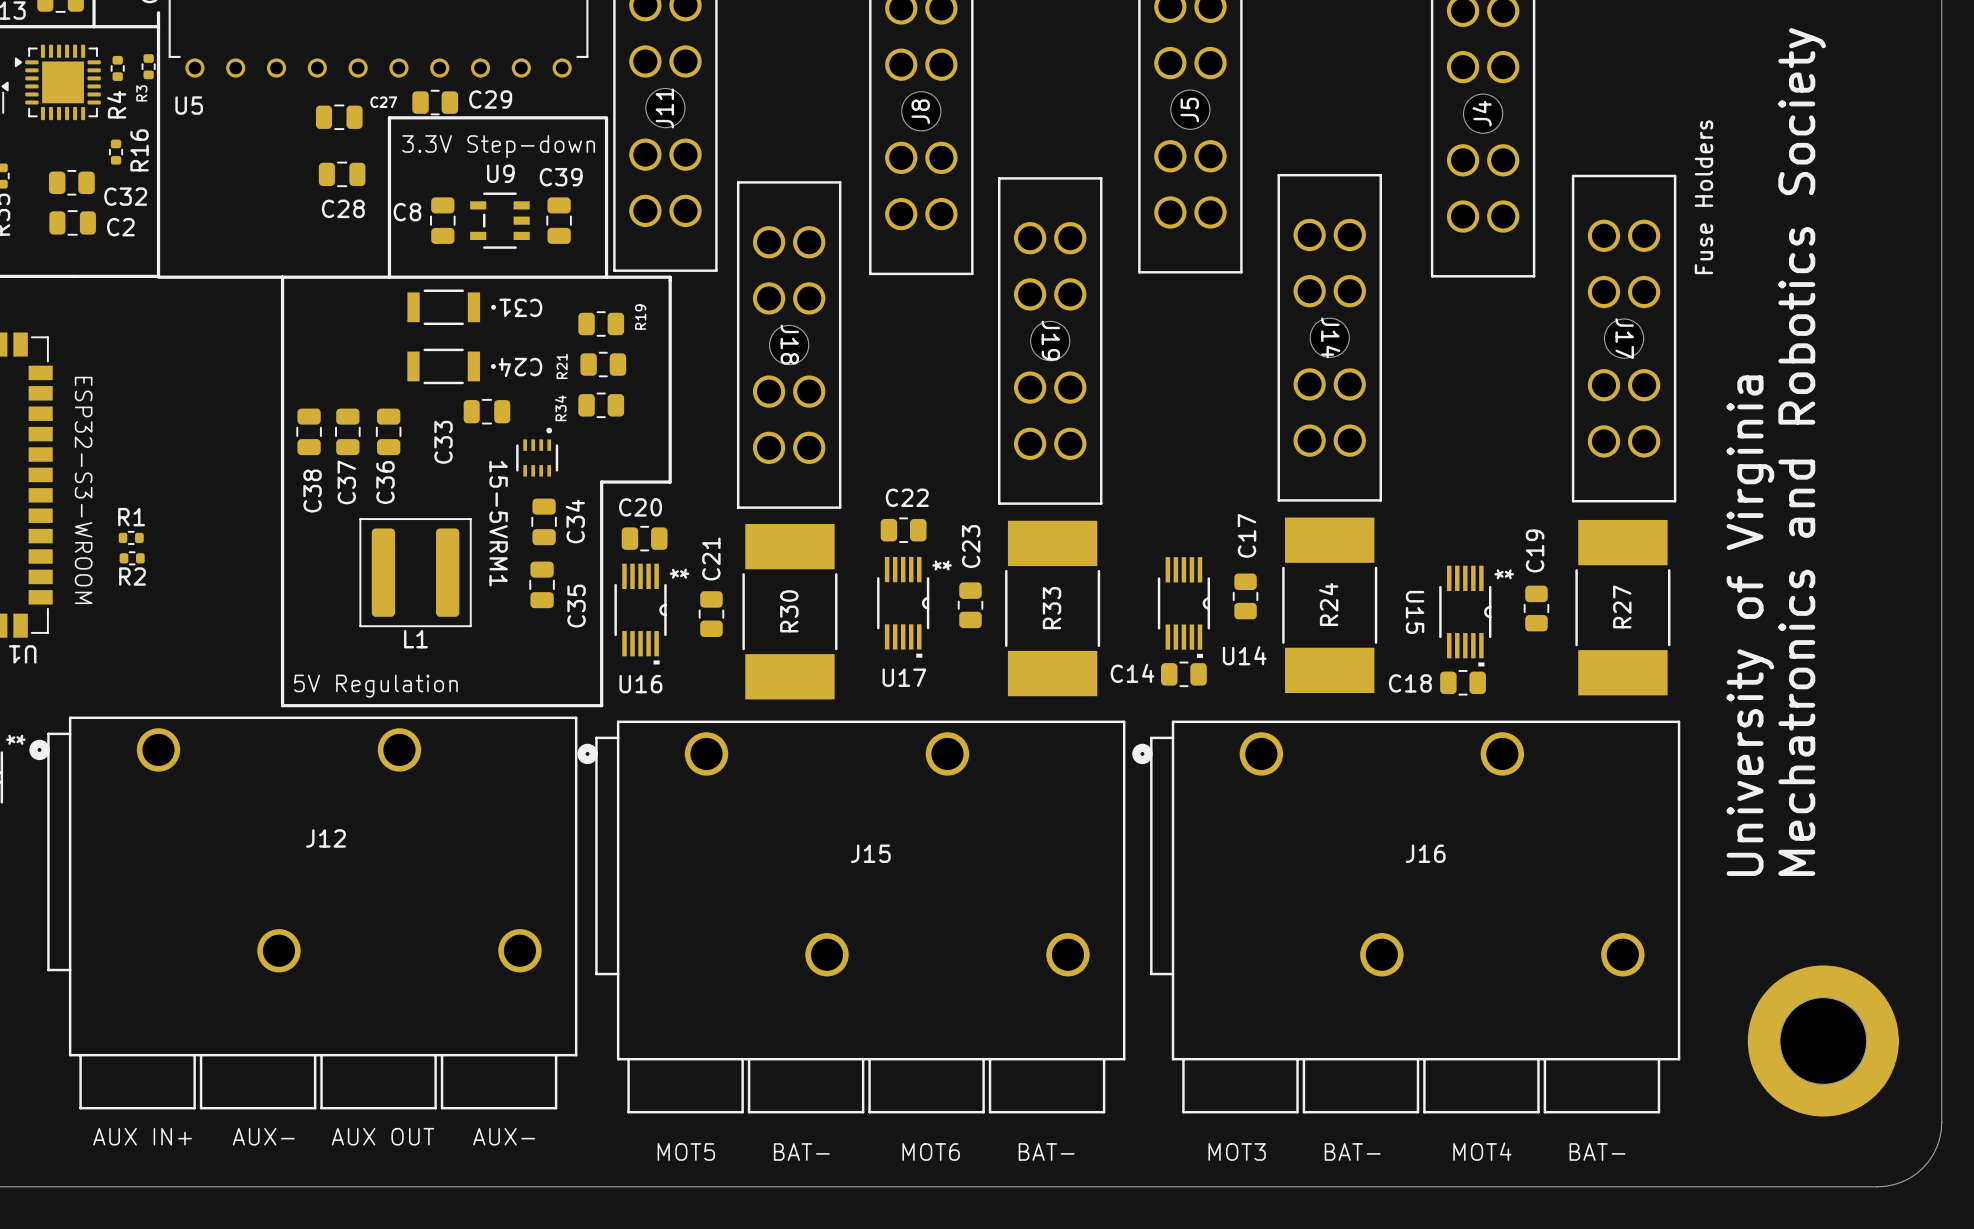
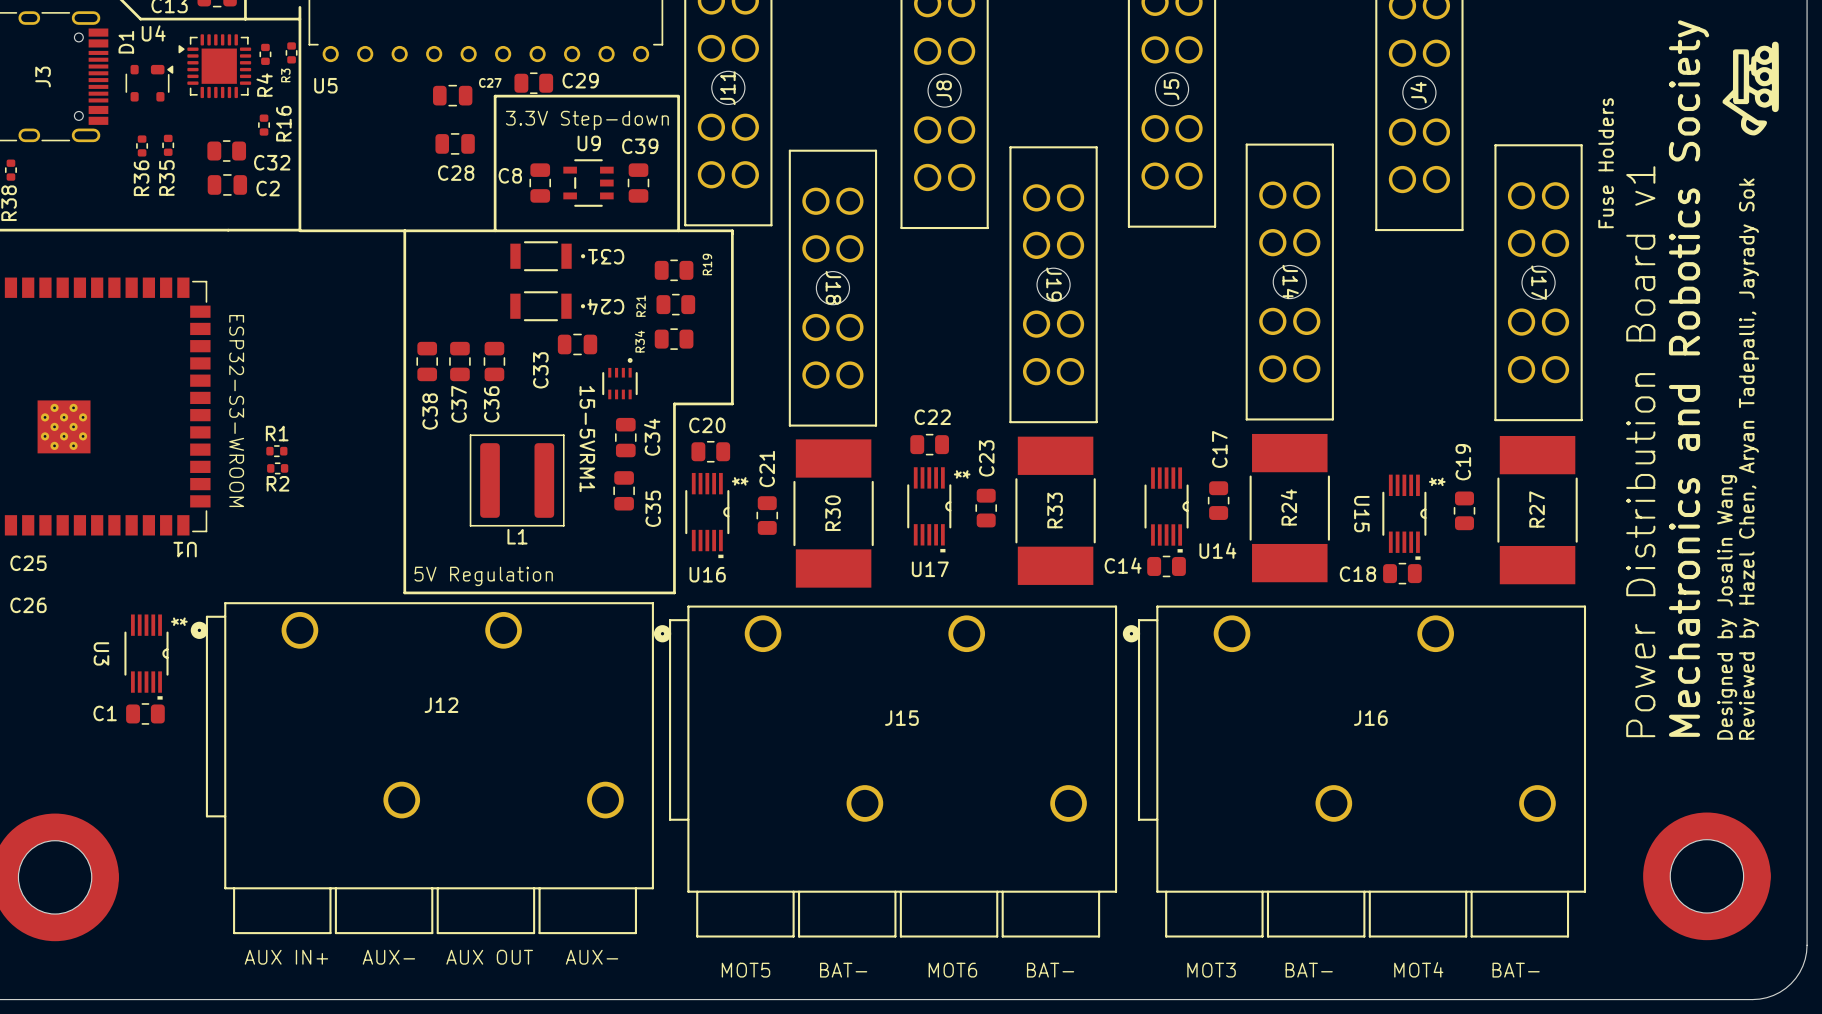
drawing: none -> [1722, 41, 1779, 136]
text: none -> Reviewed by Hazel Chen, Aryan Tadepalli, Jayrady Sok (1749, 459)
text: University of Virginia (1750, 625) -> Power Distribution Board v1 (1640, 451)
text: none -> Designed by Josalin Wang (1727, 607)

